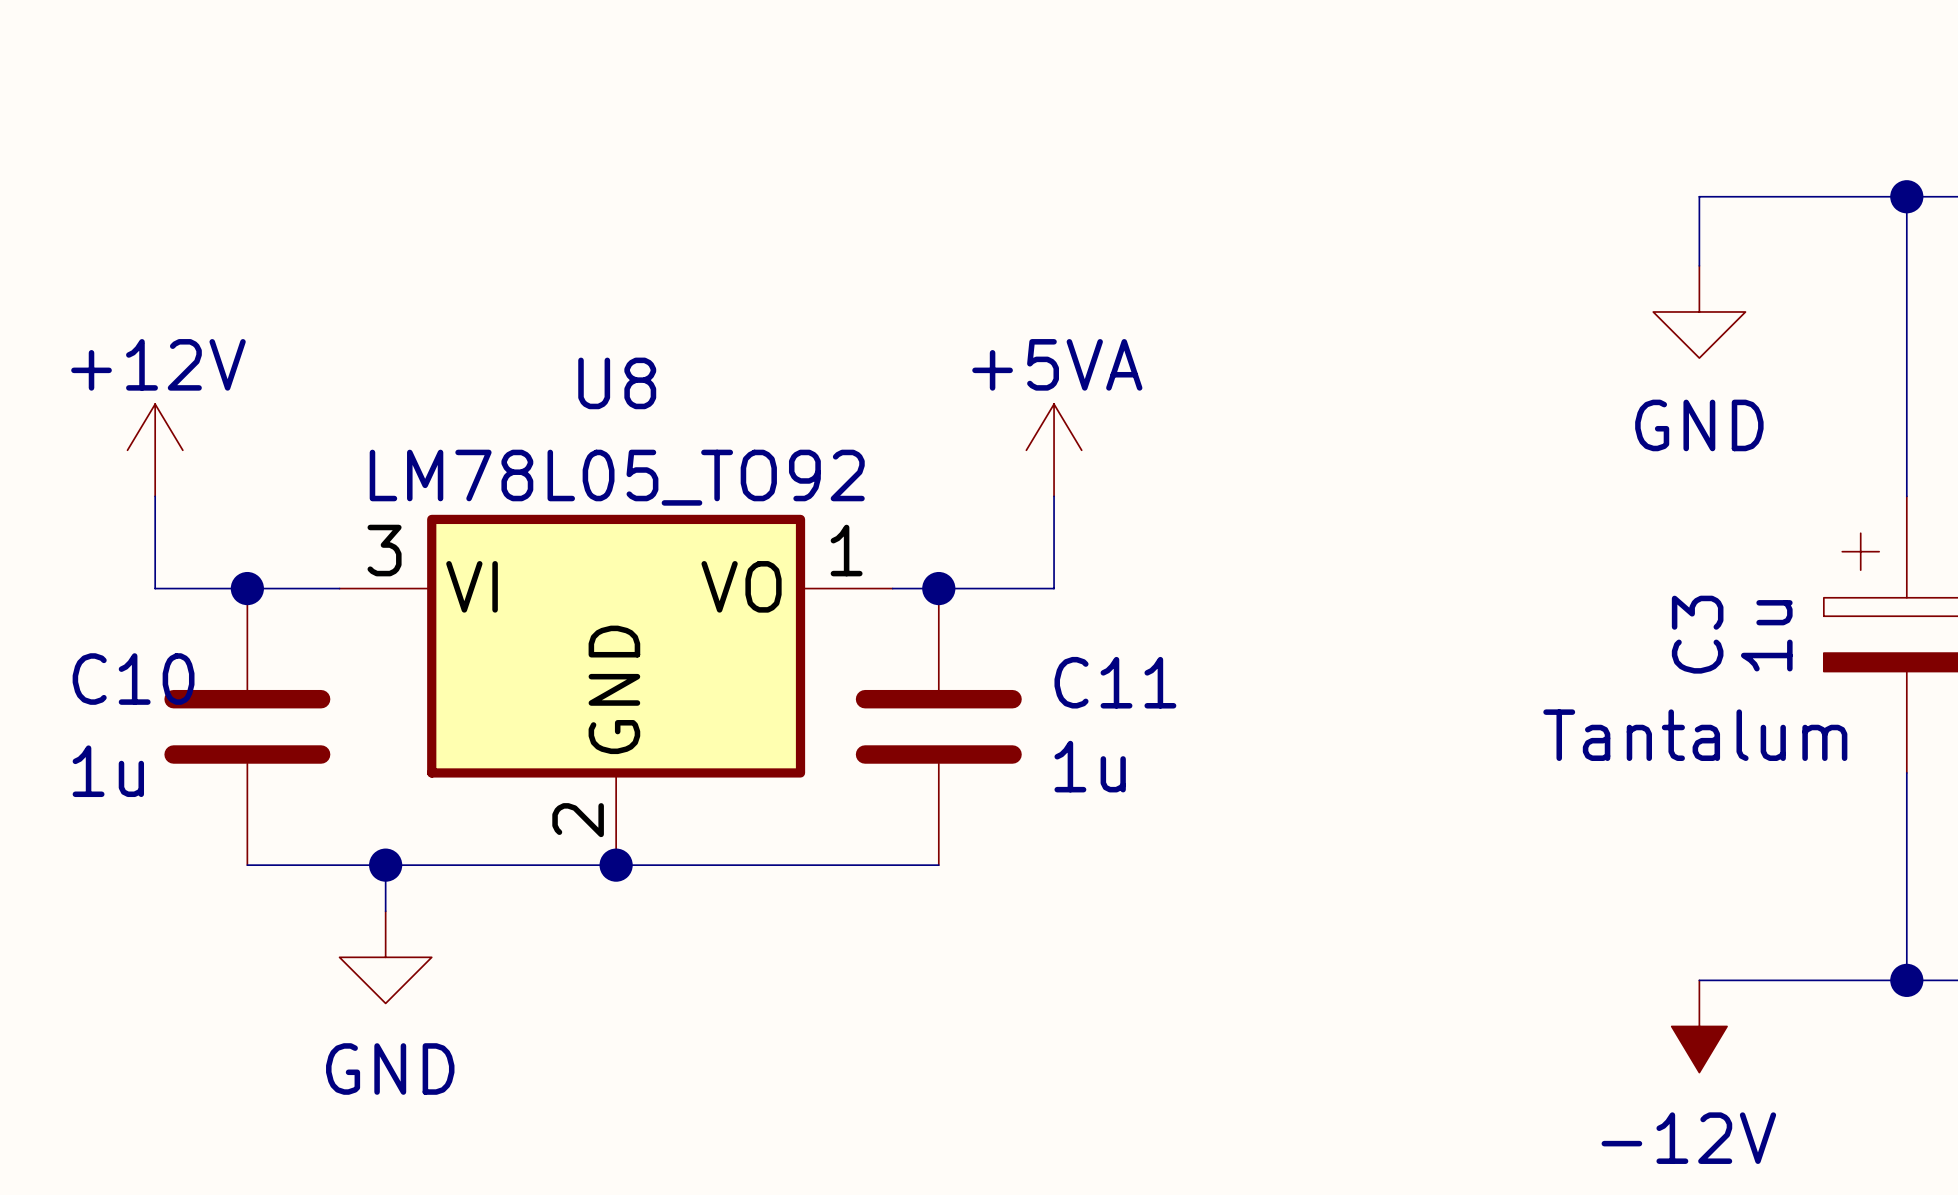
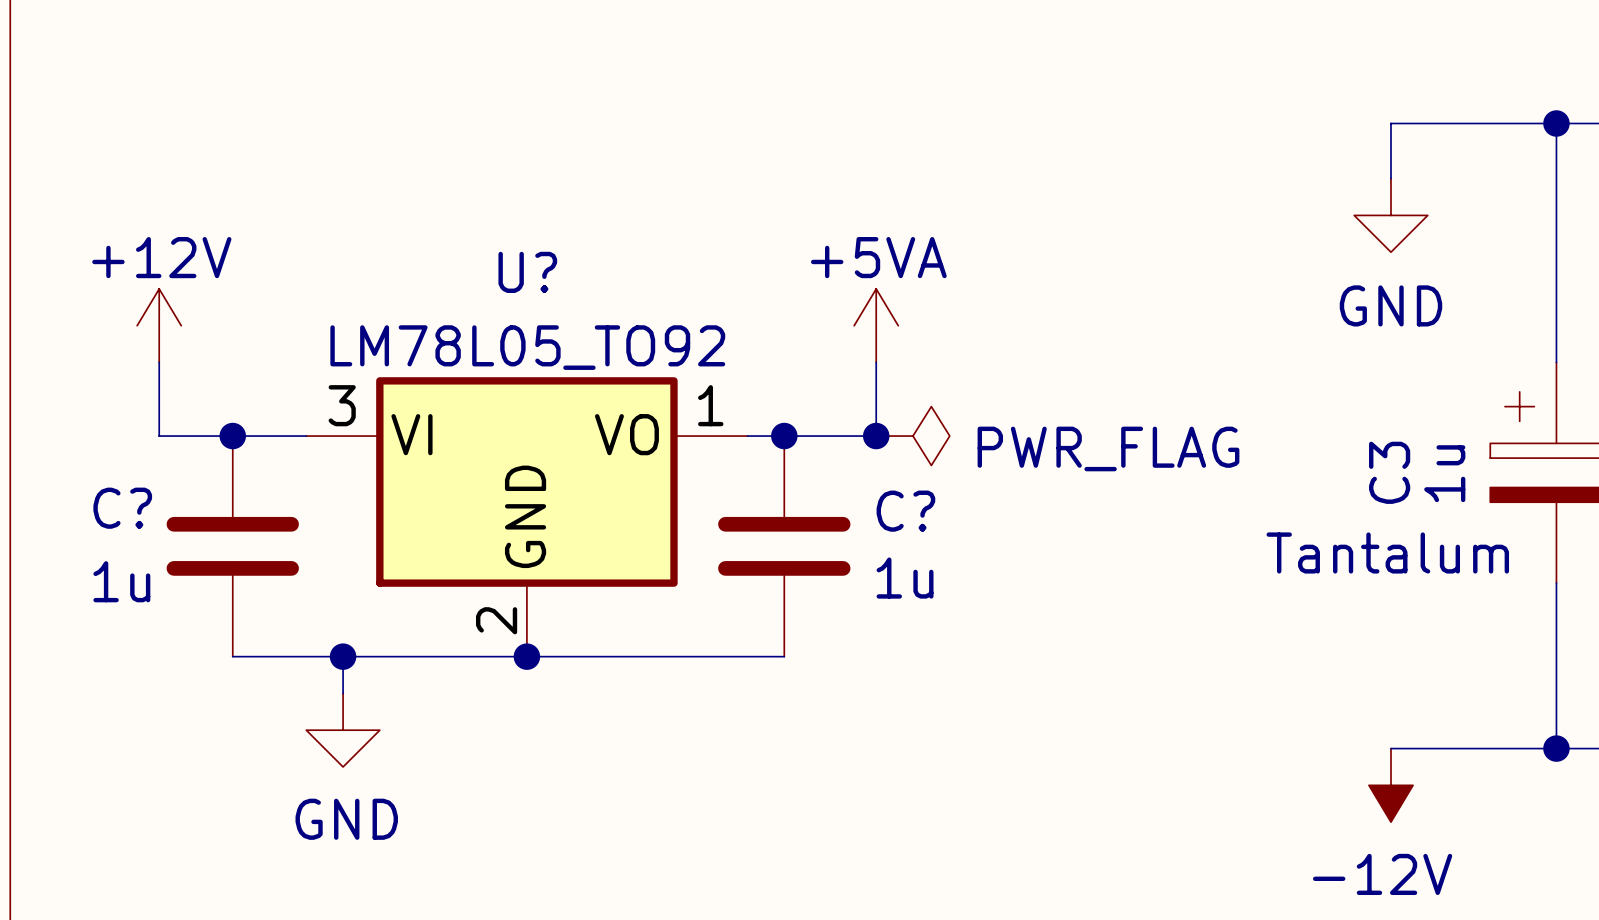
U8 name: U8 (617, 383) -> U? (527, 272)
junction: none -> (876, 436)
power symbol: none -> PWR_FLAG (912, 436)
C10 name: C10 (133, 679) -> C? (122, 508)
C11 name: C11 (1115, 682) -> C? (905, 511)

